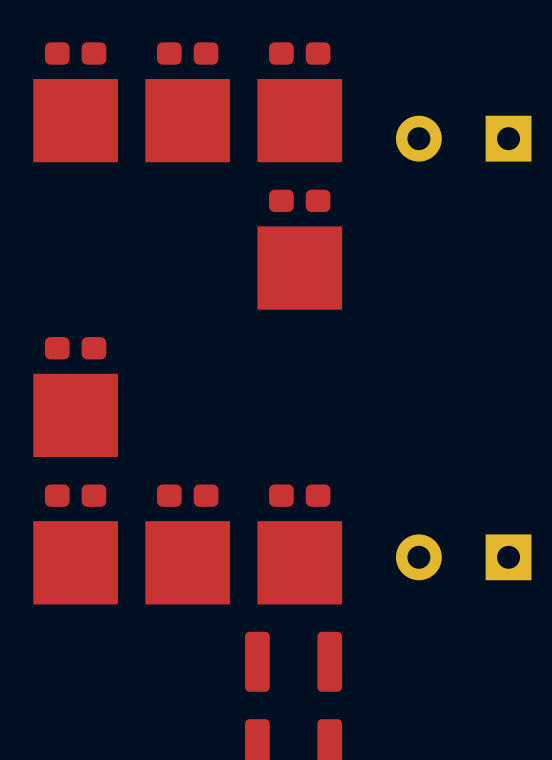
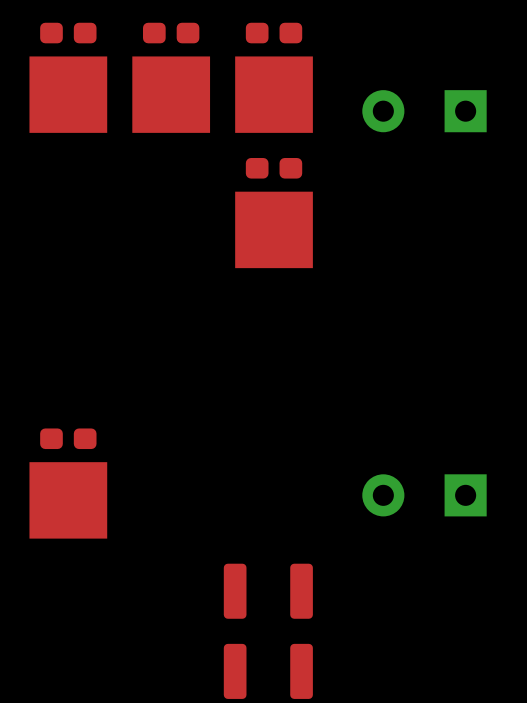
part: (75, 397) -> none
part: (187, 544) -> none
part: (299, 544) -> none

